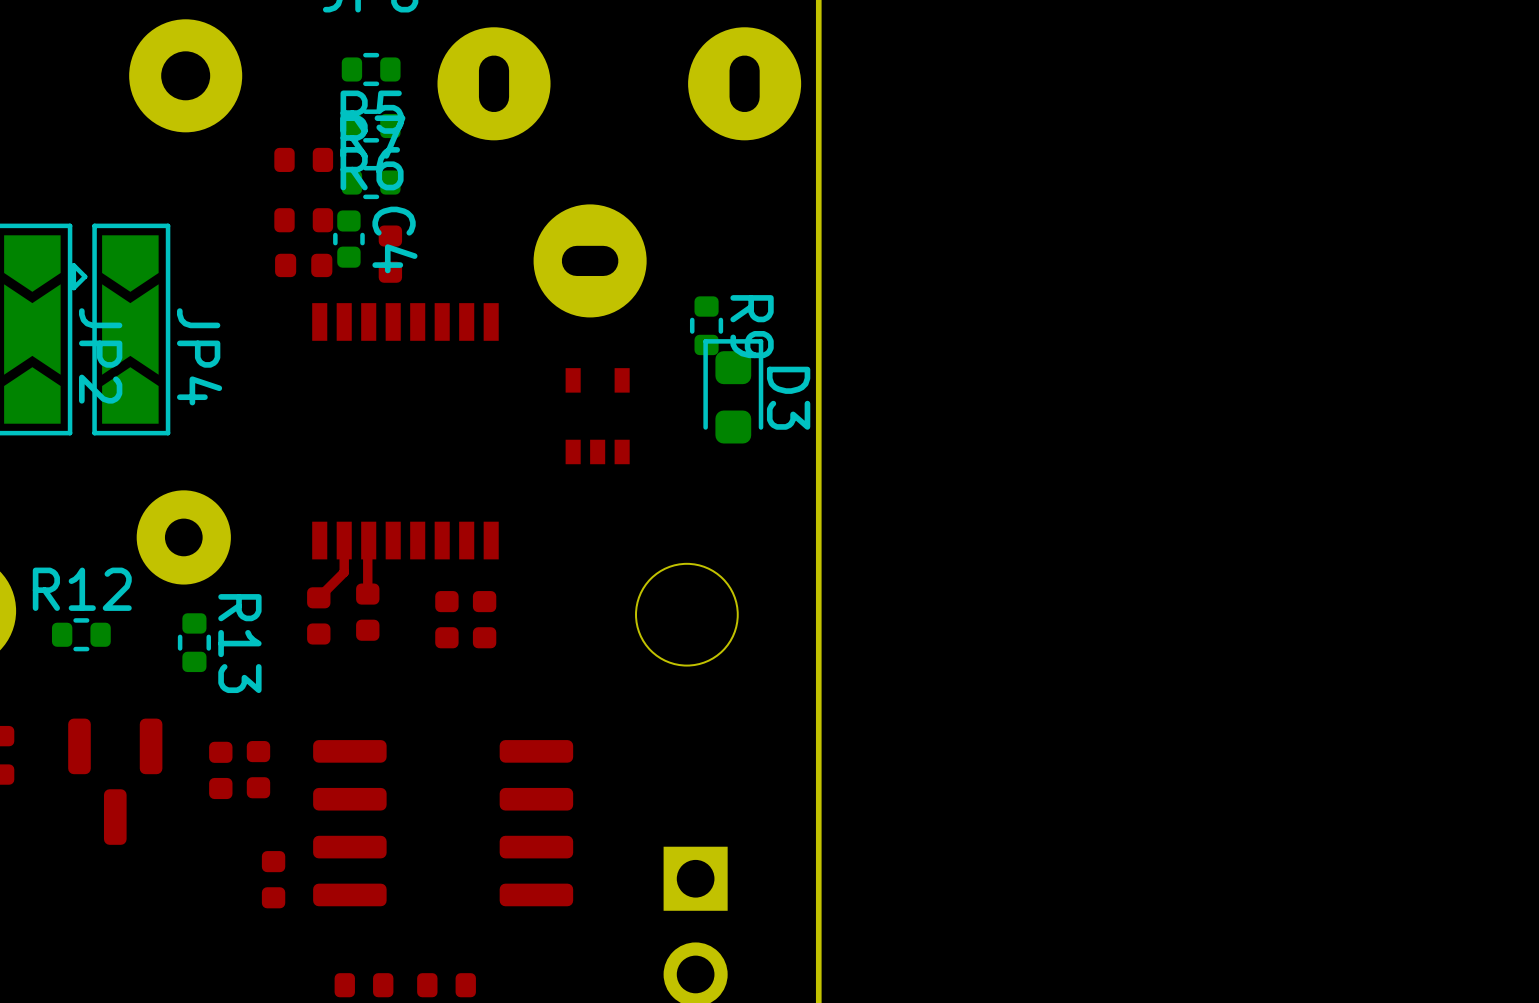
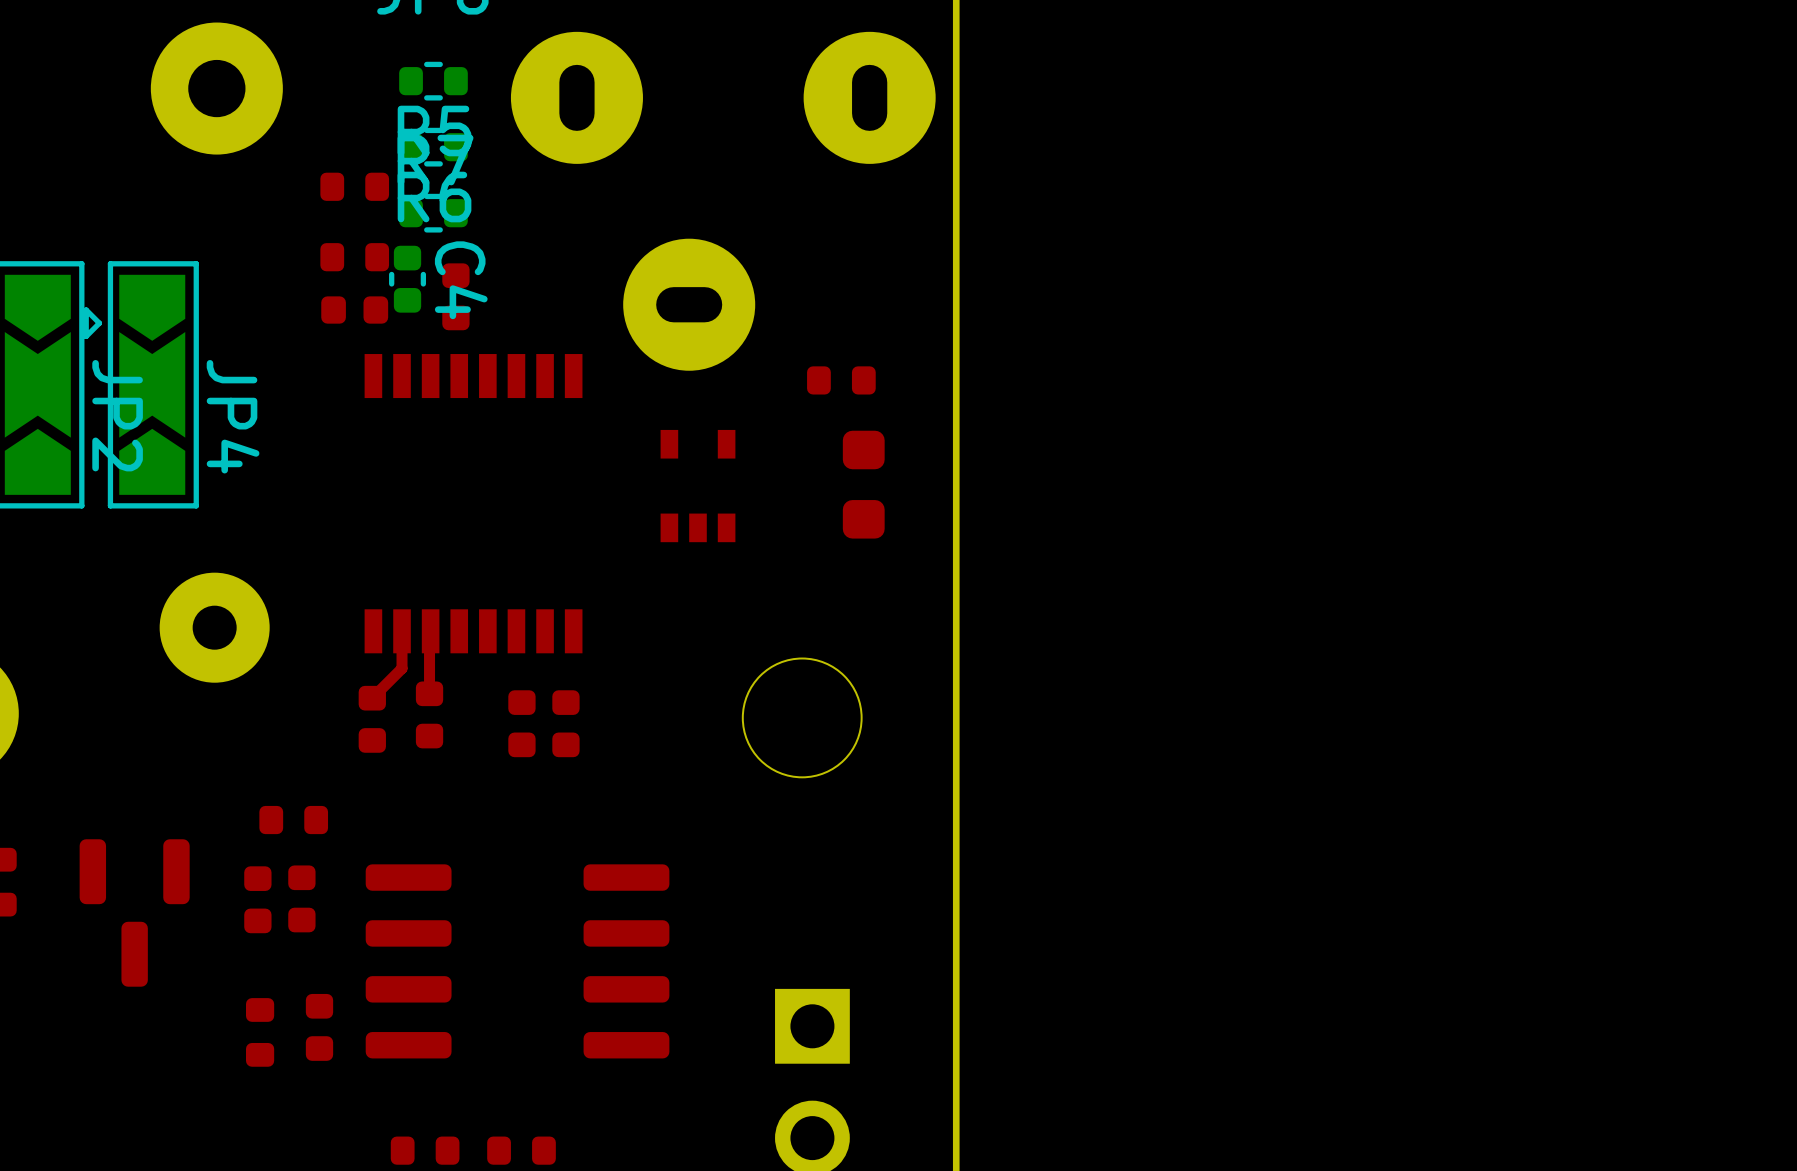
R9 side: bottom (706, 325) -> top (841, 380)
D3 side: bottom (733, 391) -> top (863, 484)
R12 side: bottom (81, 634) -> top (260, 1032)
R13 side: bottom (194, 642) -> top (293, 820)

